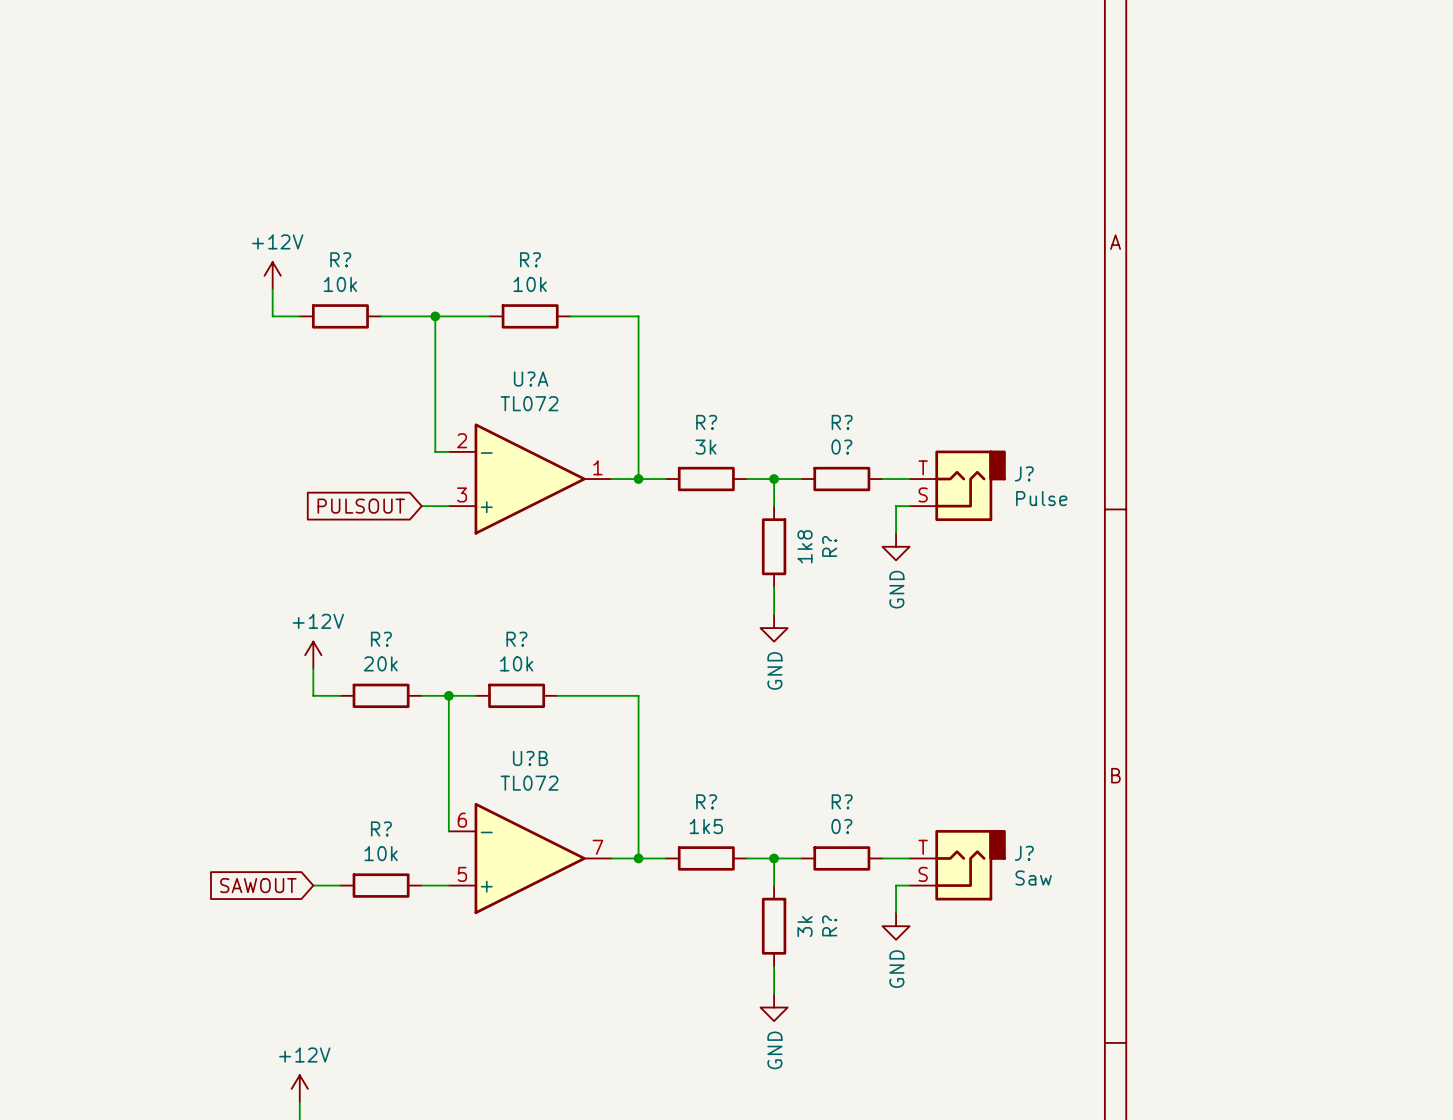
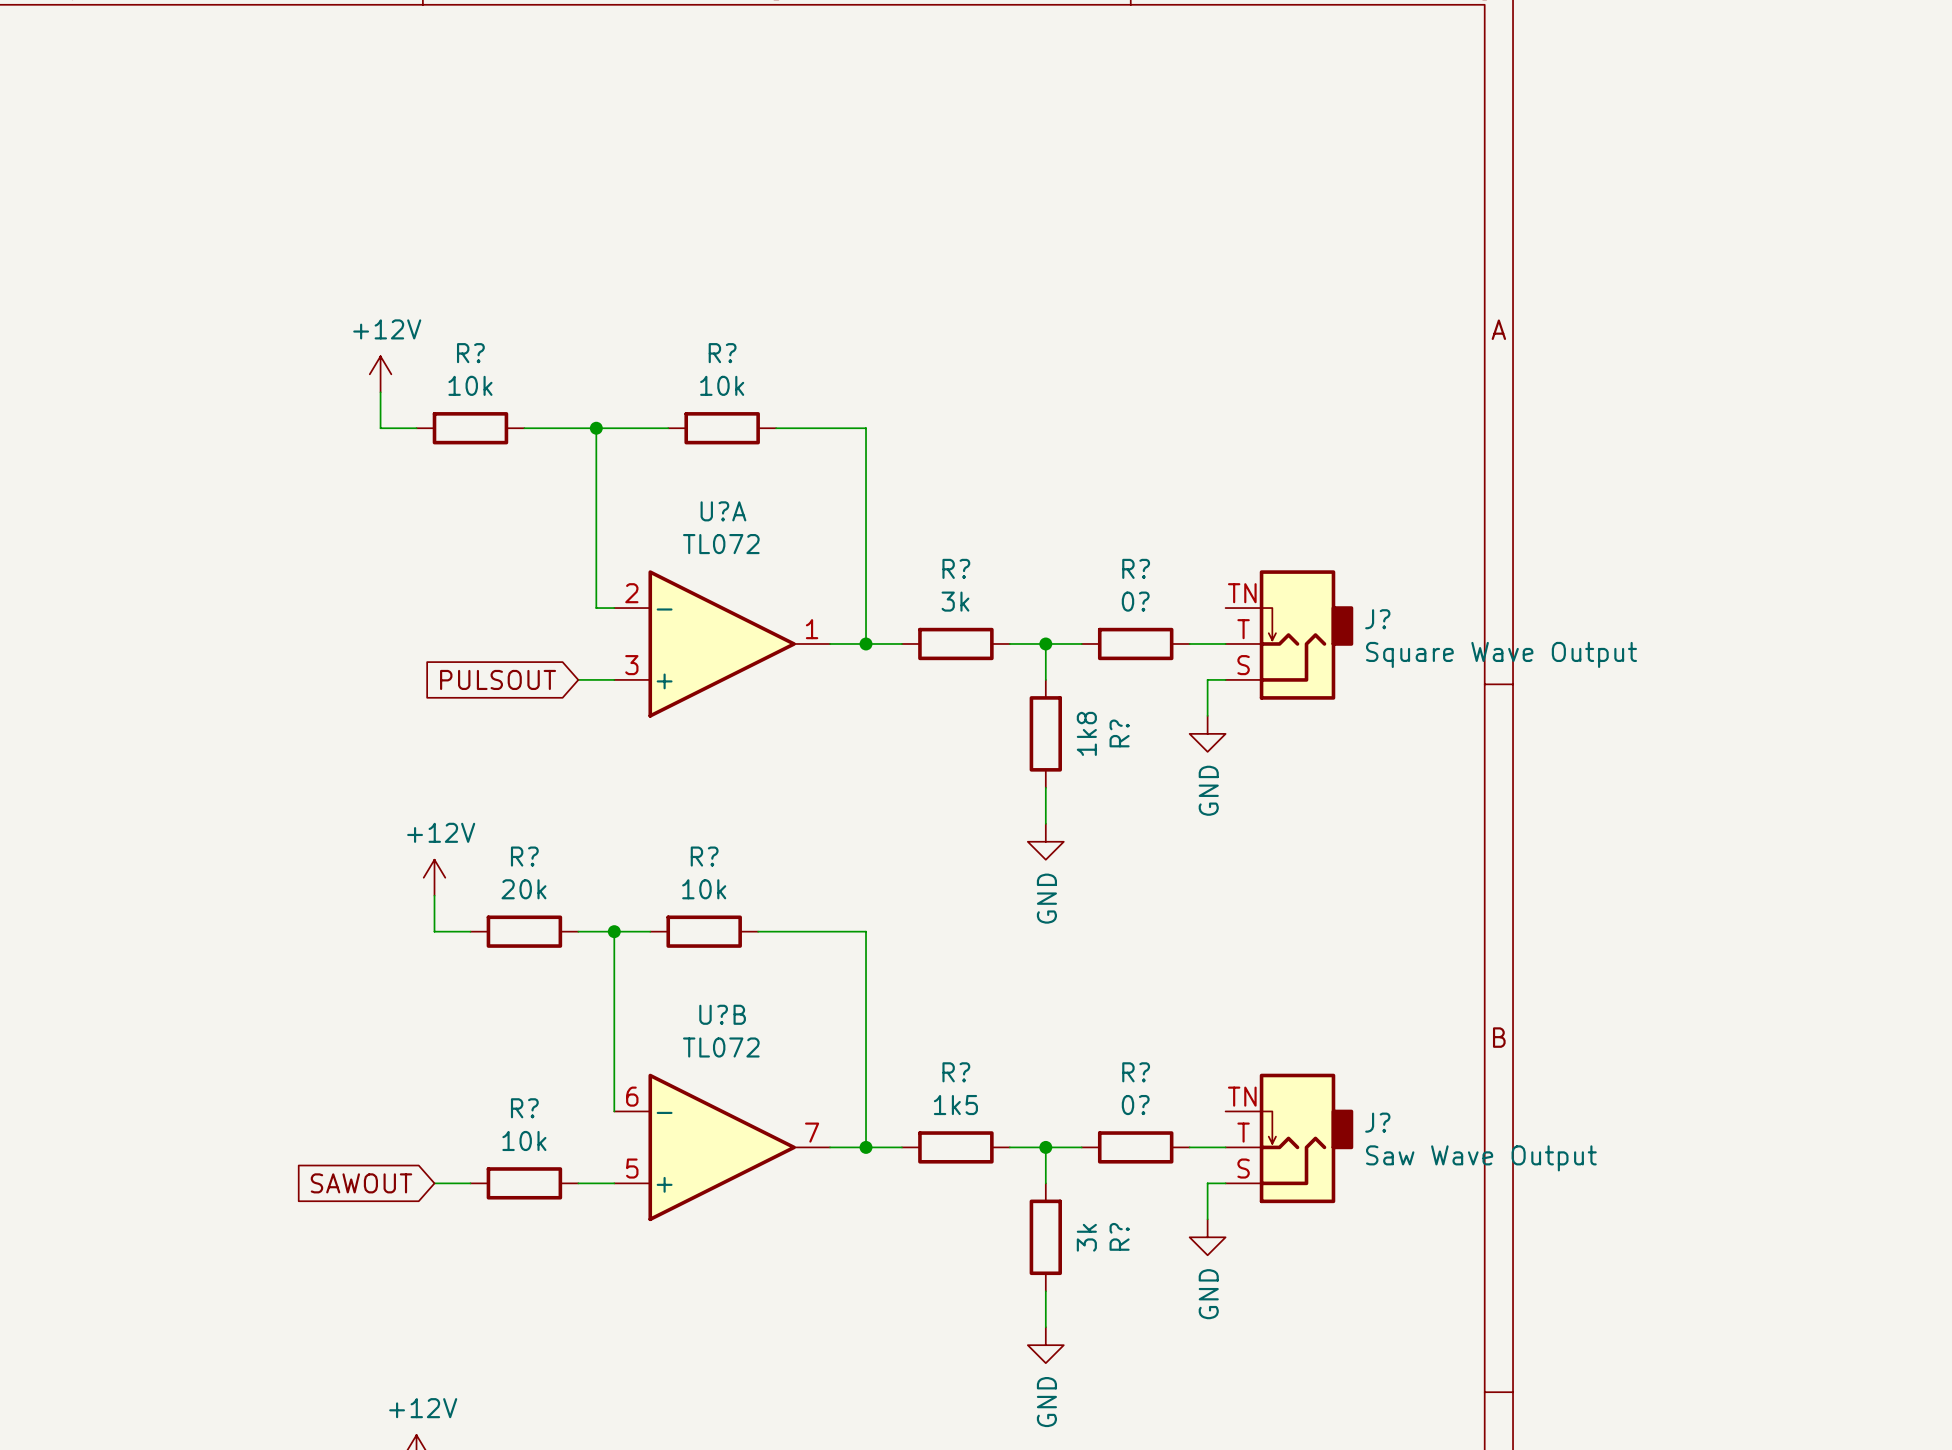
J?: none -> Square Wave Output (1289, 635)
J?: Pulse (957, 485) -> none
J?: none -> Saw Wave Output (1289, 1138)
J?: Saw (957, 865) -> none

